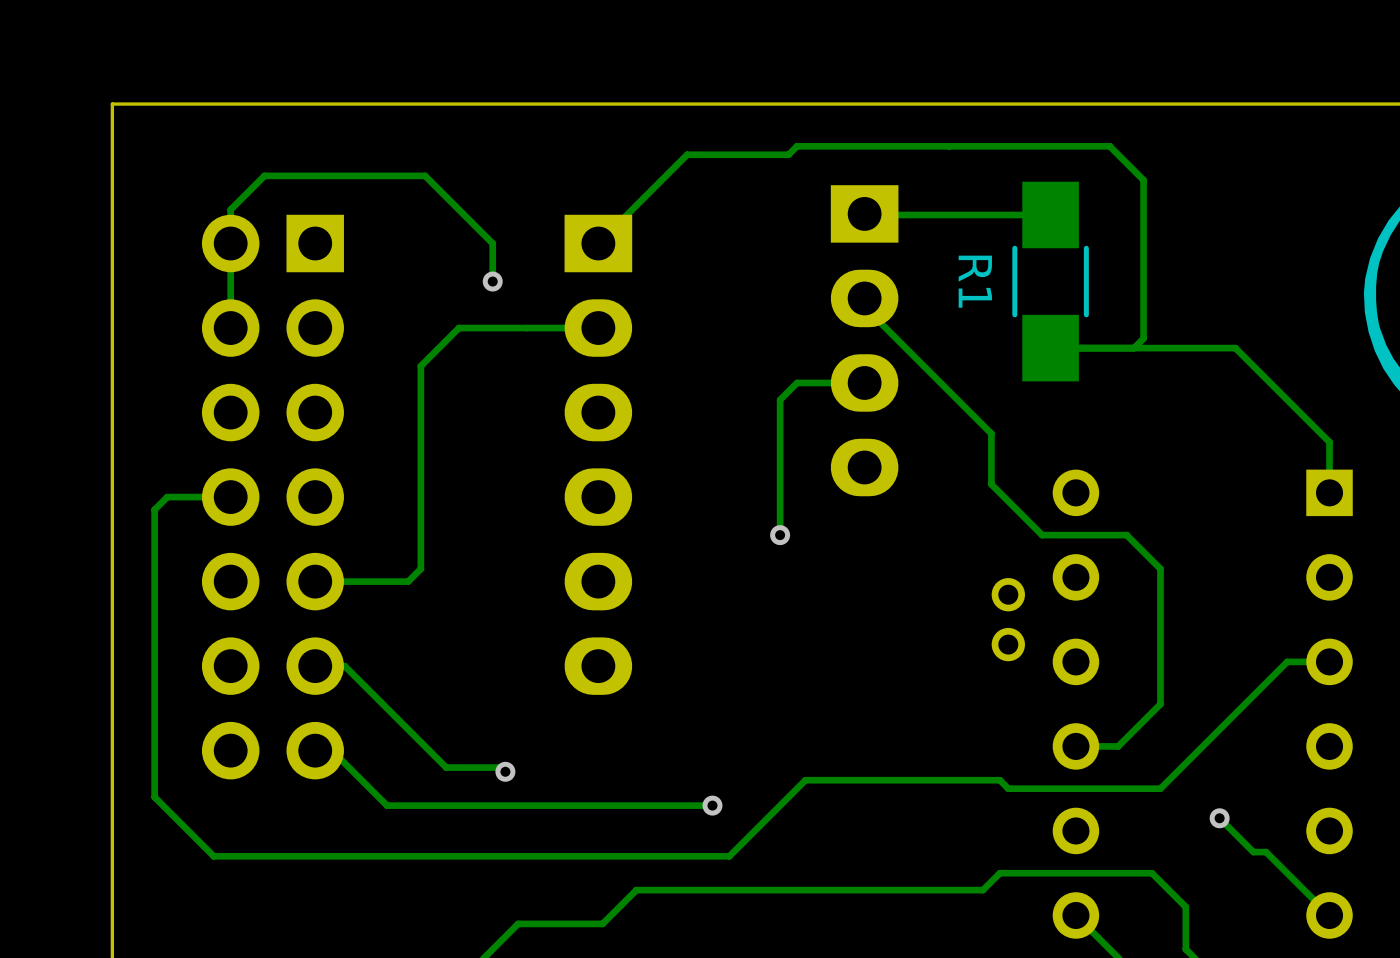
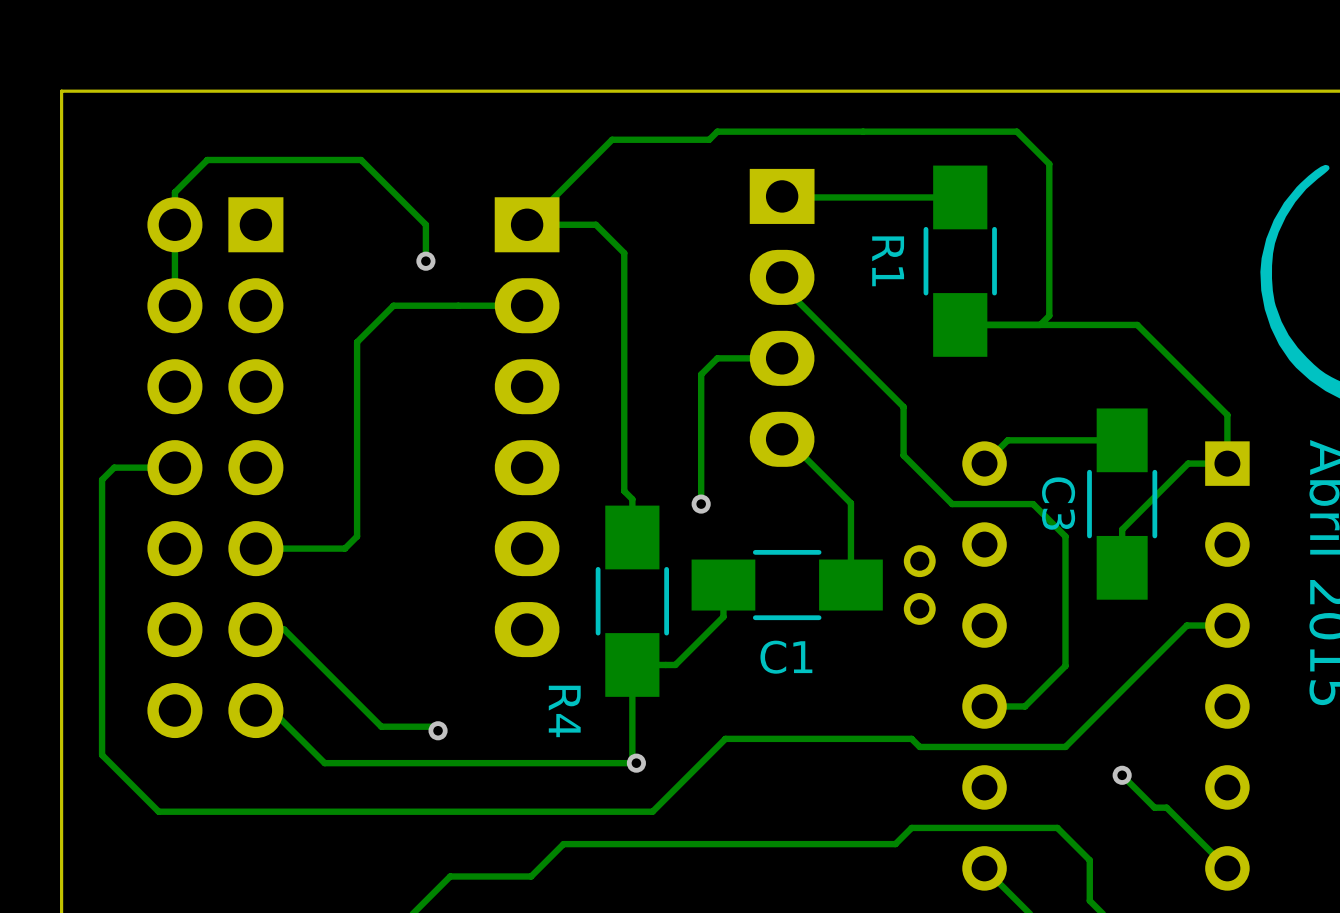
track: none -> (527, 224) (595, 224) (624, 253) (624, 491) (632, 499) (632, 537)
track: none -> (782, 439) (786, 439) (850, 503) (850, 585)
track: none -> (1122, 440) (1007, 440) (984, 463)
track: none -> (1227, 463) (1188, 463) (1122, 529) (1122, 567)
C3: none -> (1122, 504)
track: none -> (723, 585) (723, 616) (675, 664) (632, 664) (632, 759) (636, 763)
C1: none -> (787, 585)
R4: none -> (632, 601)

